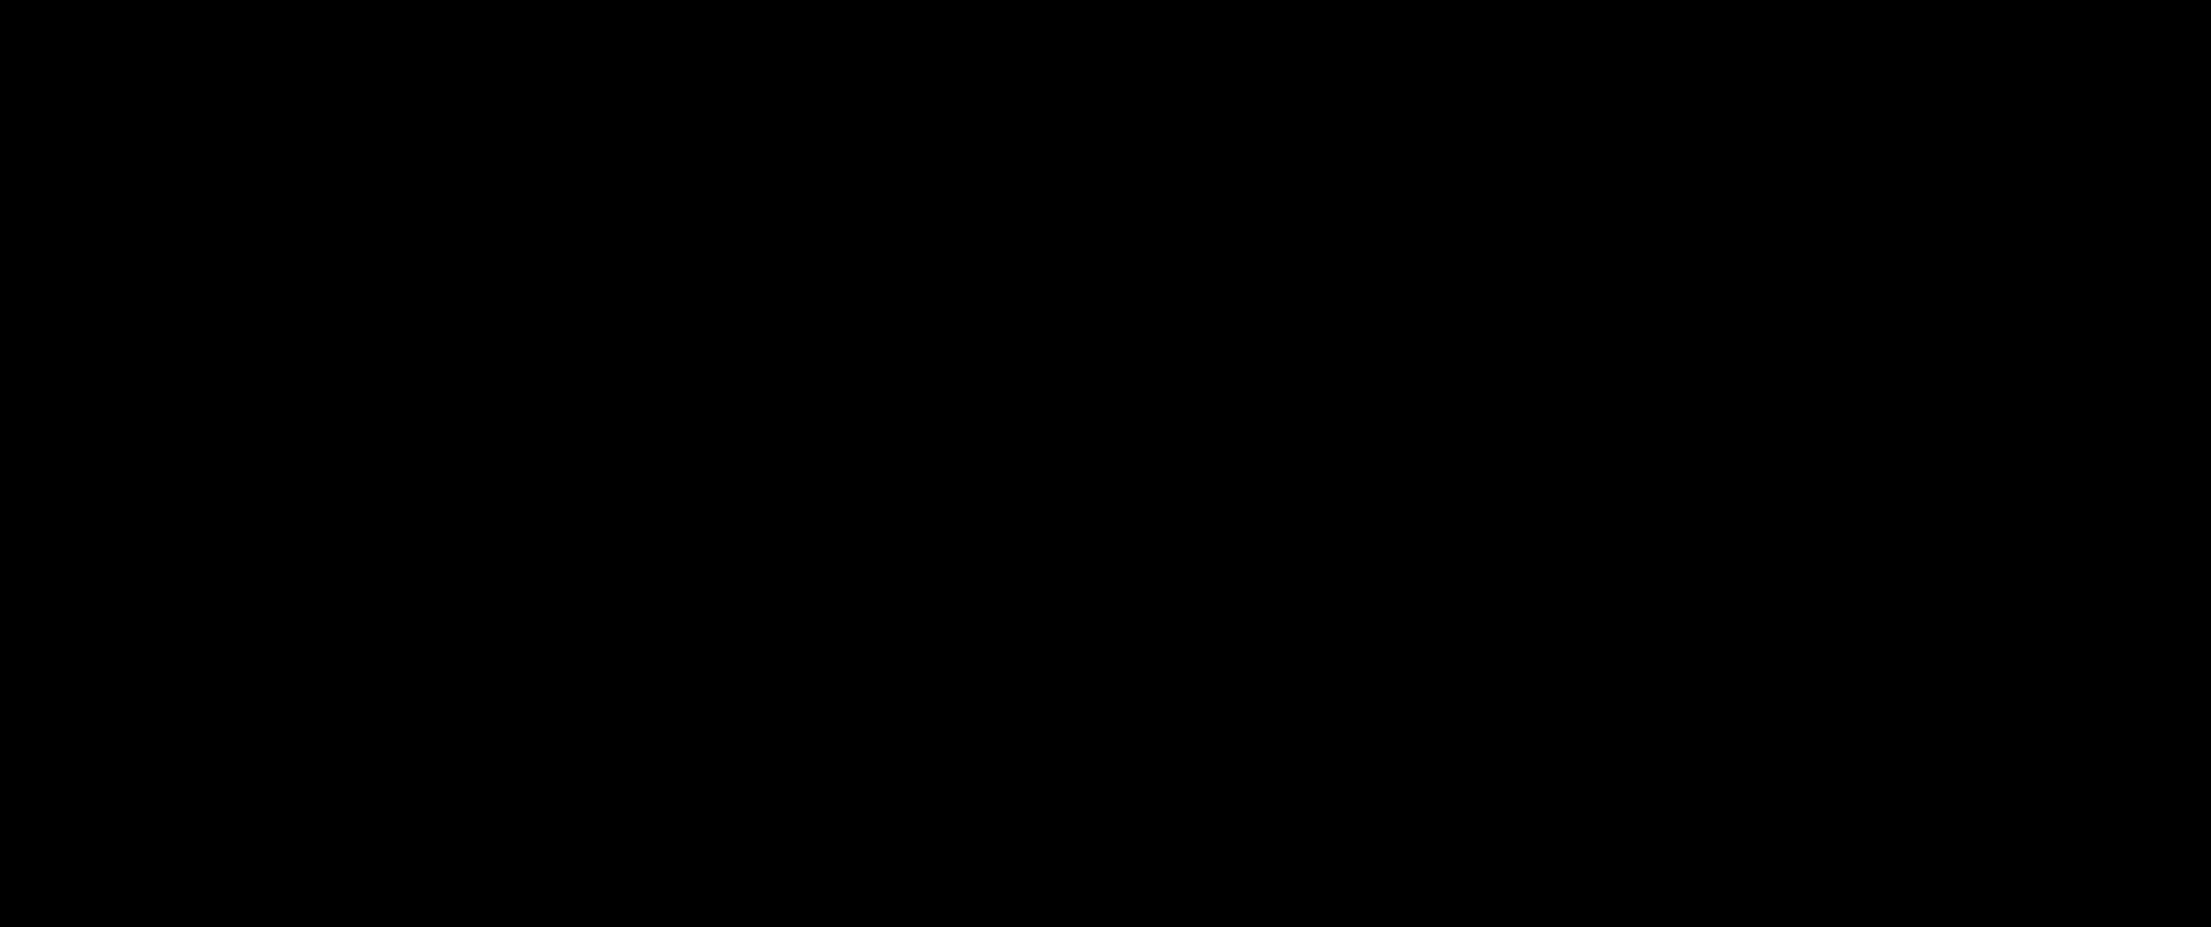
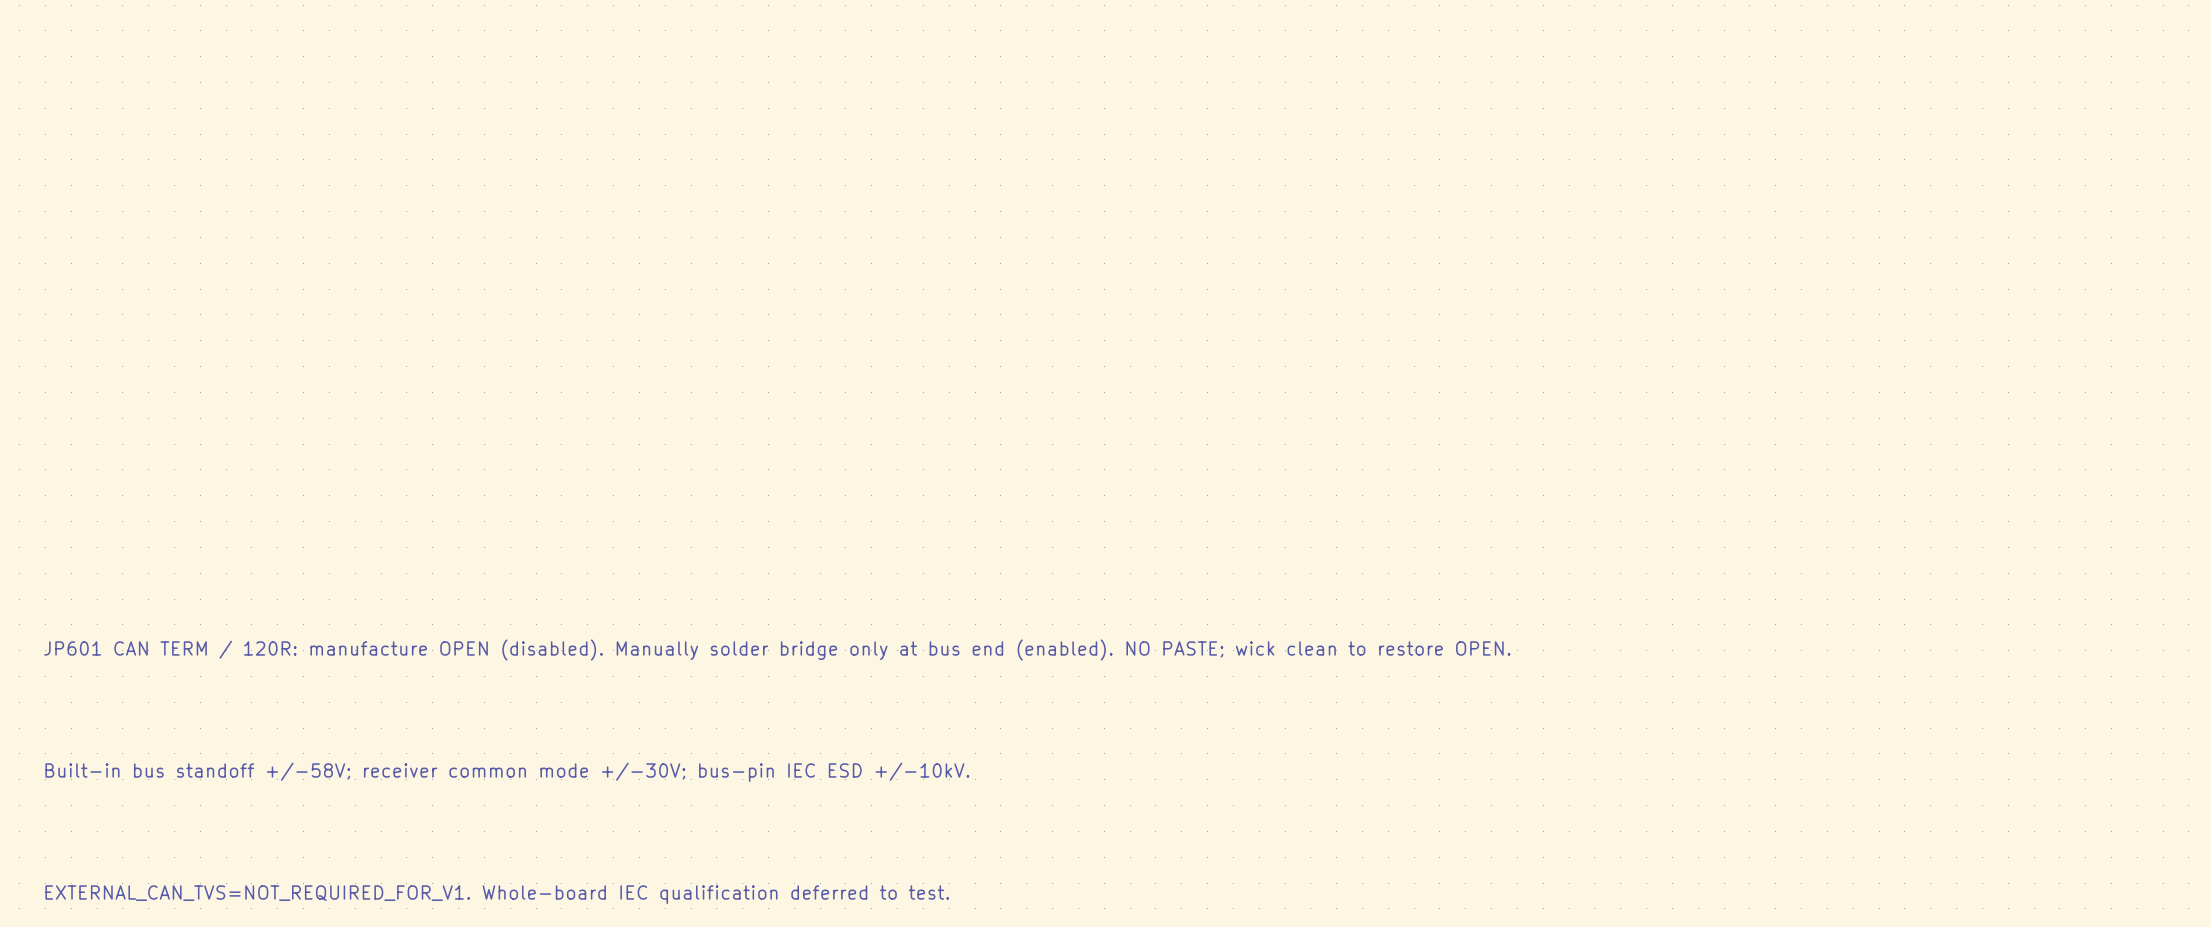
text: none -> JP601 CAN TERM / 120R: manufacture OPEN (disabled). Manually solder bridge only at bus end (enabled). NO PASTE; wick clean to restore OPEN. (777, 650)
text: none -> Built-in bus standoff +/-58V; receiver common mode +/-30V; bus-pin IEC ESD +/-10kV. (507, 772)
text: none -> EXTERNAL_CAN_TVS=NOT_REQUIRED_FOR_V1. Whole-board IEC qualification deferred to test. (497, 894)

